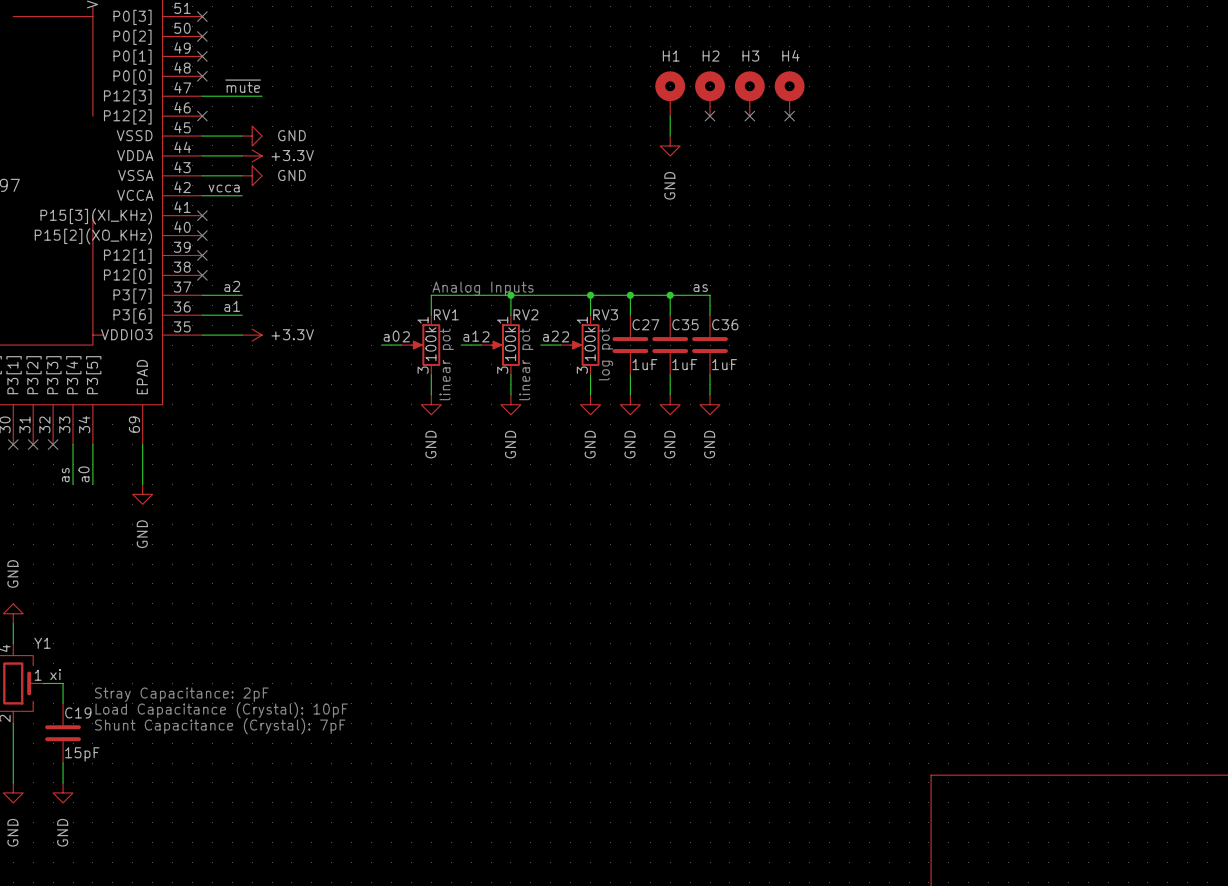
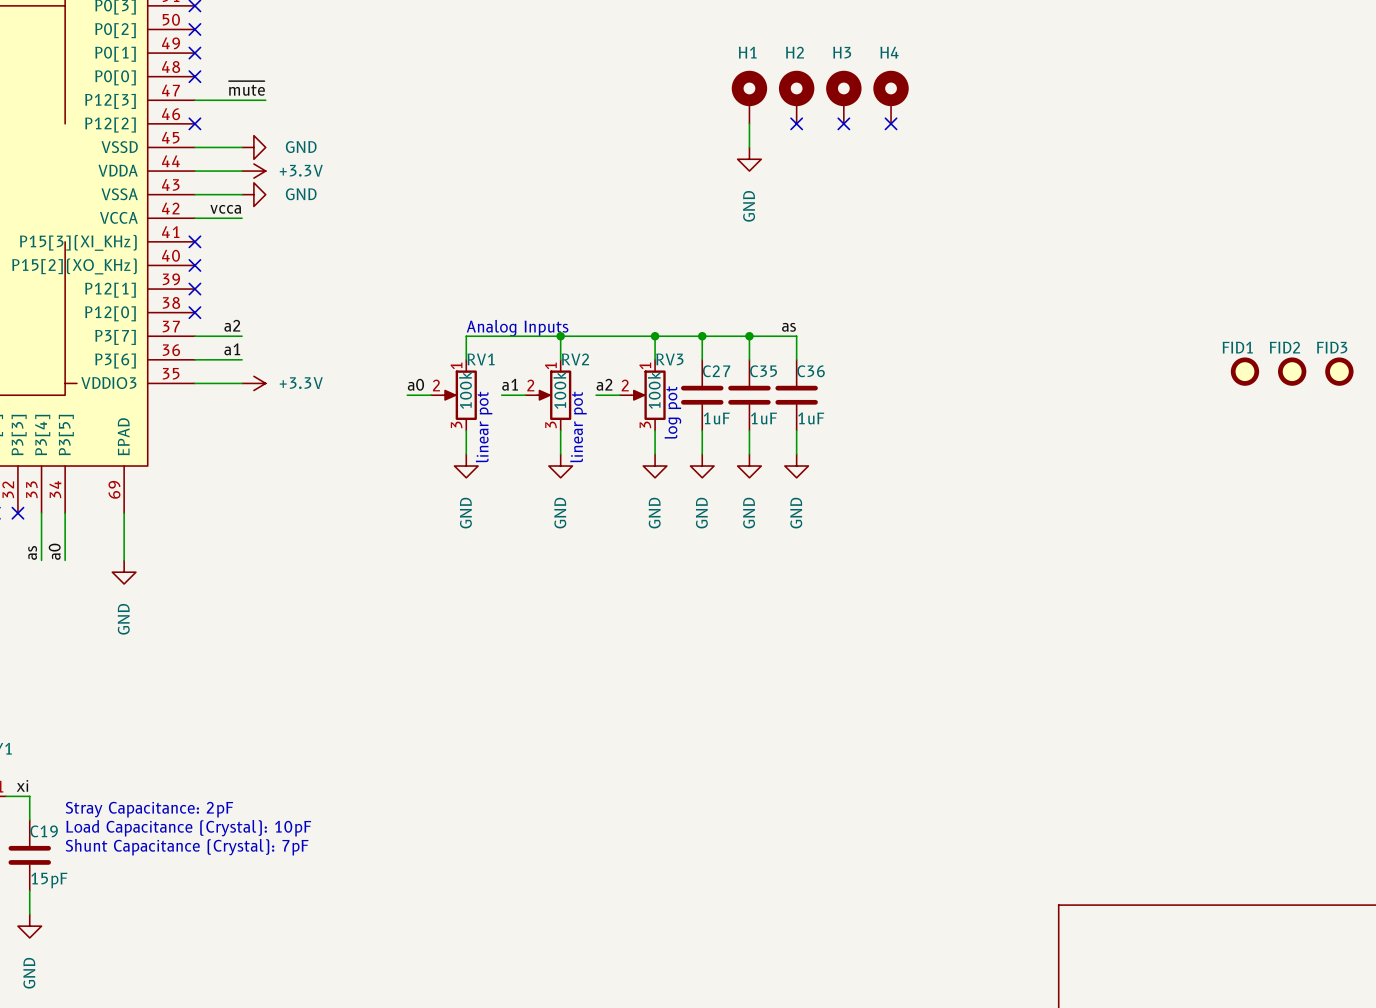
FID1: none -> (1244, 371)
FID2: none -> (1292, 371)
FID3: none -> (1339, 371)

